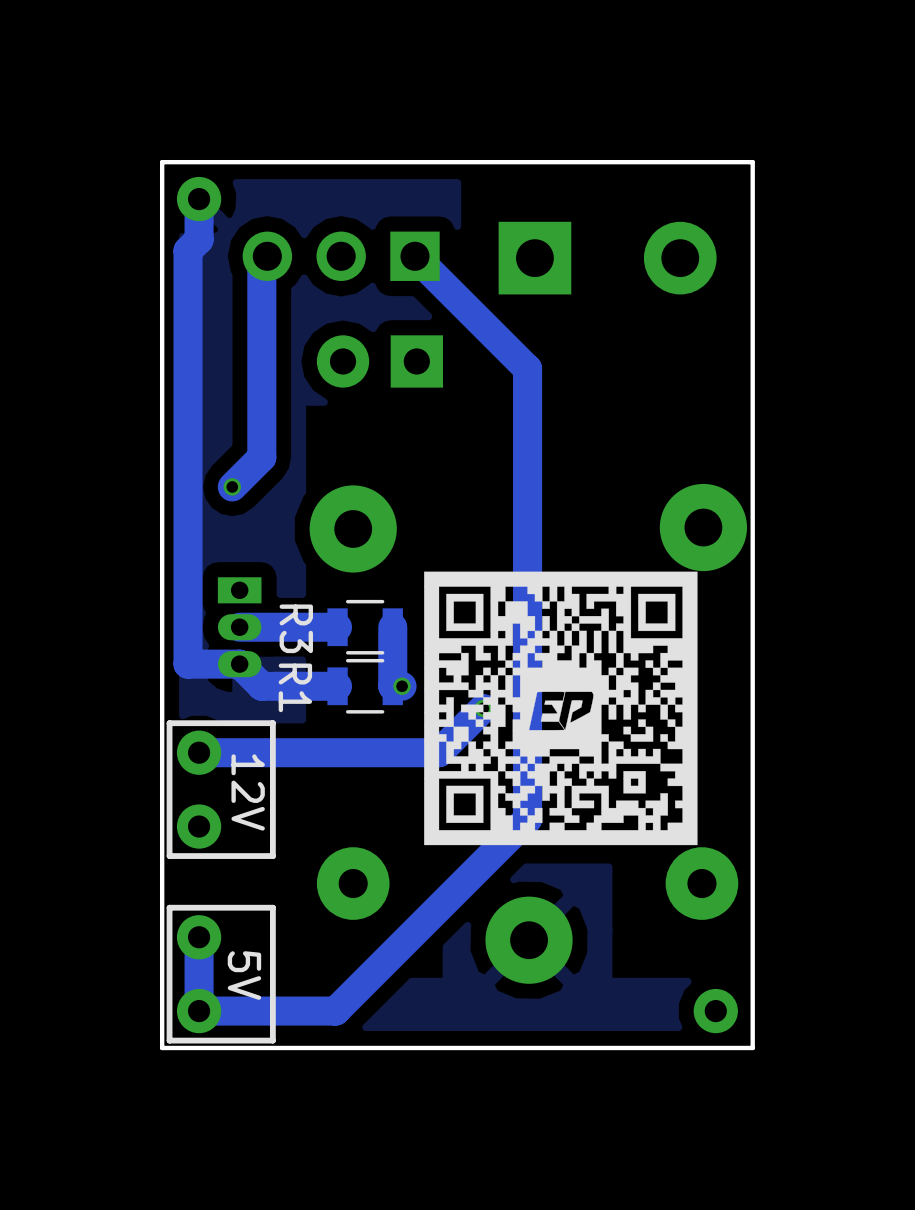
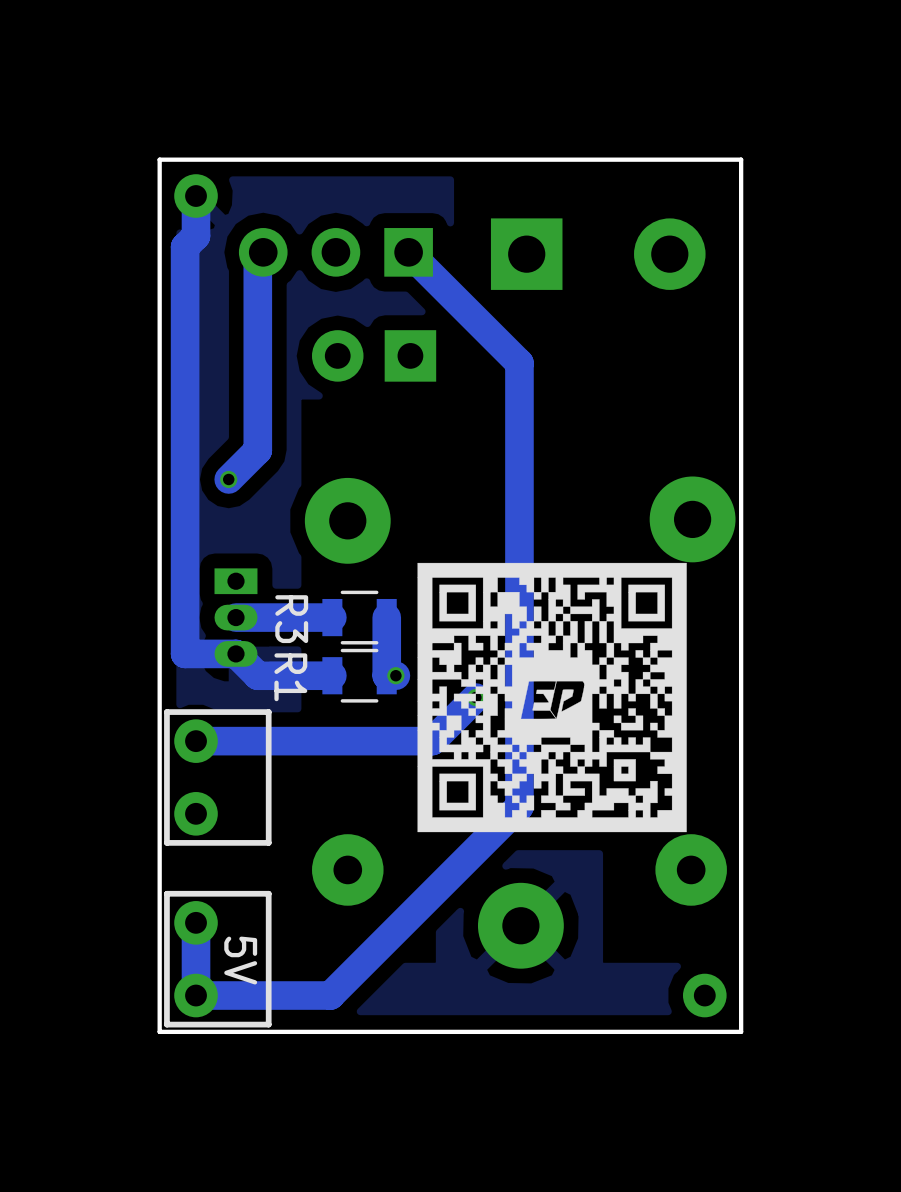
text: 12V (248, 792) -> none

